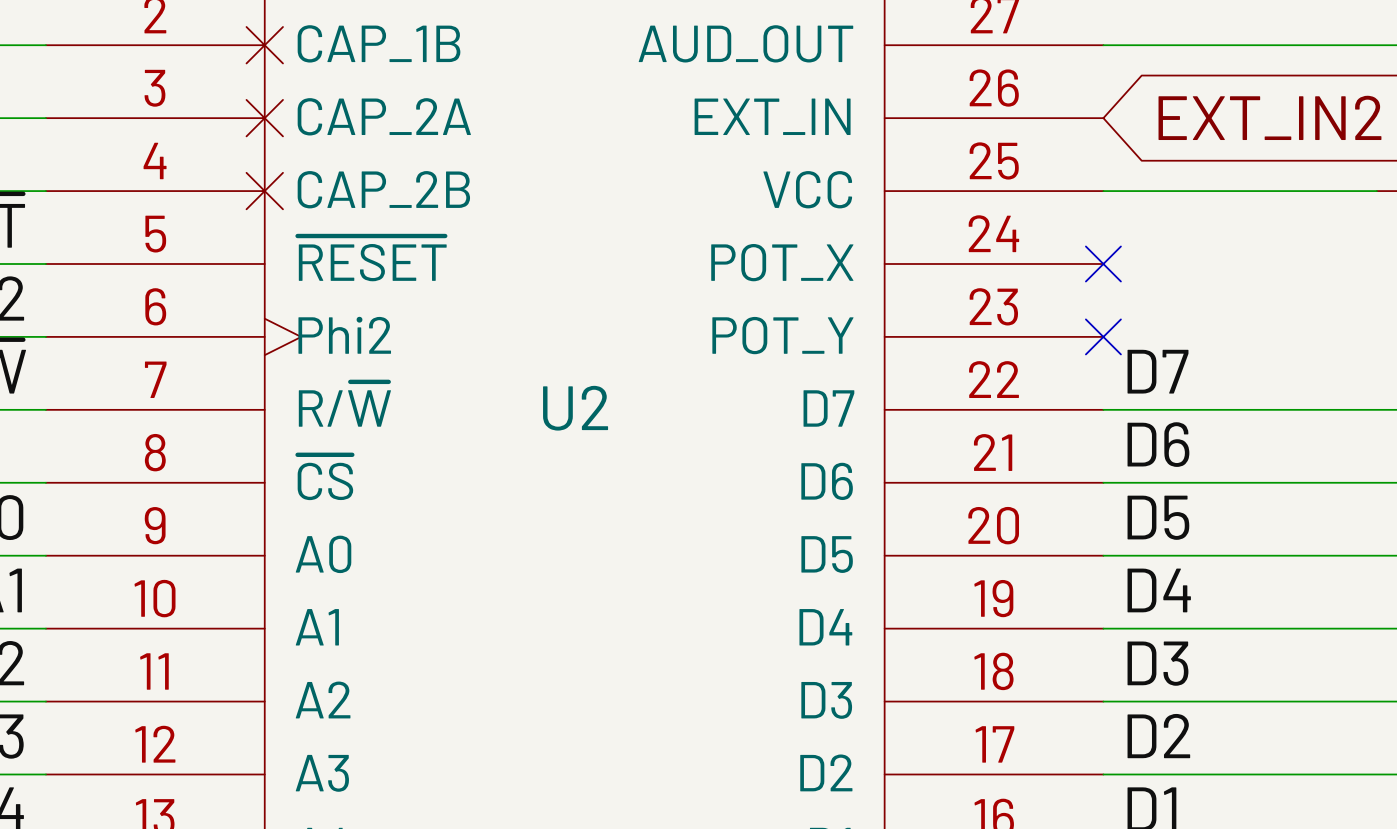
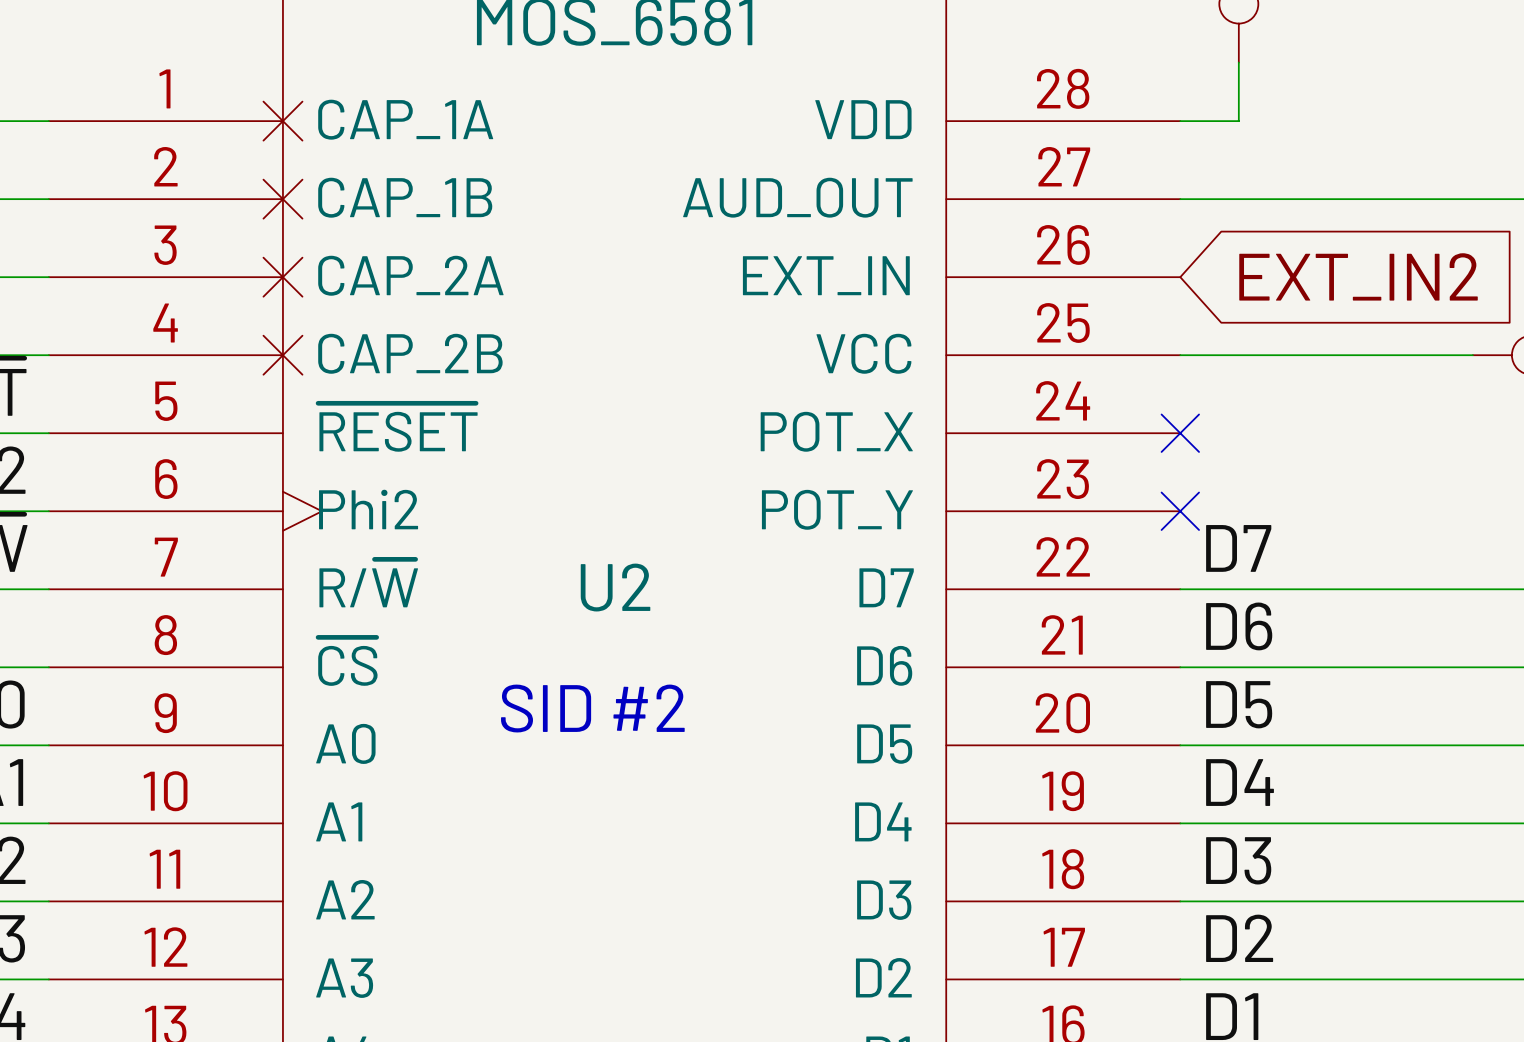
text: none -> SID #2 (592, 708)

